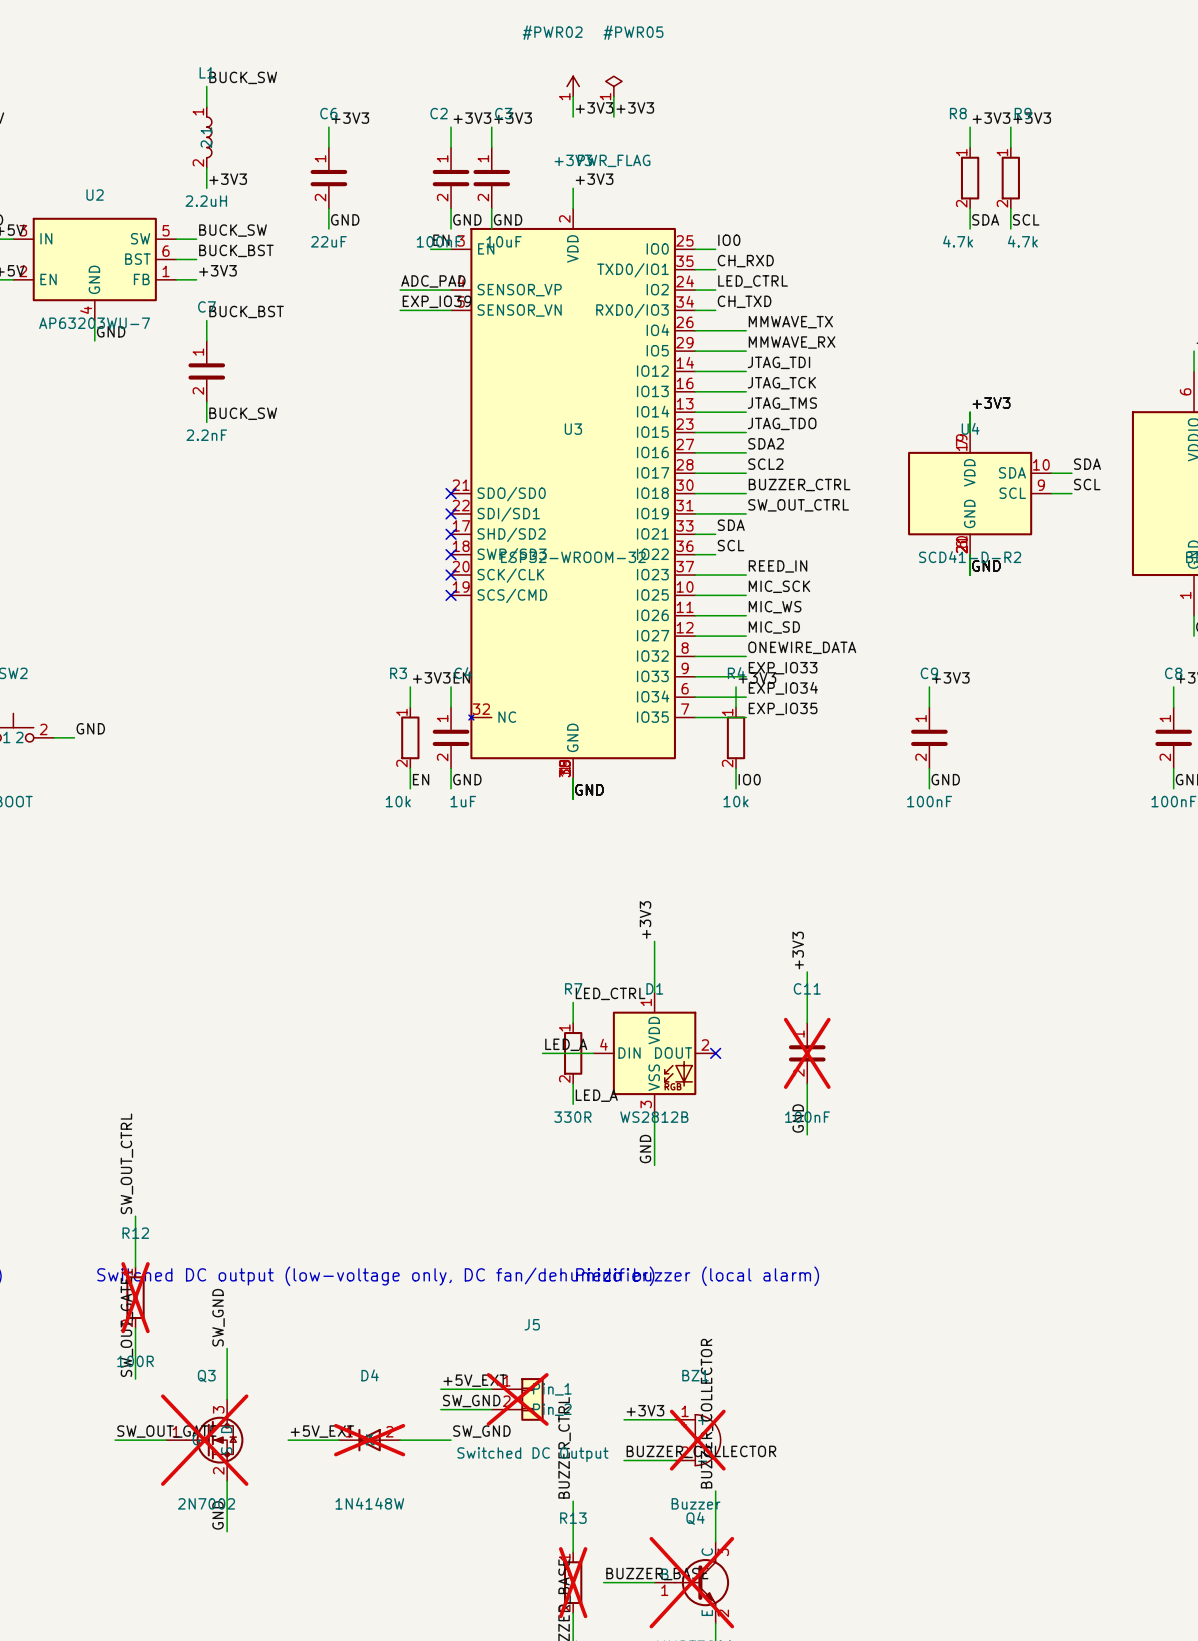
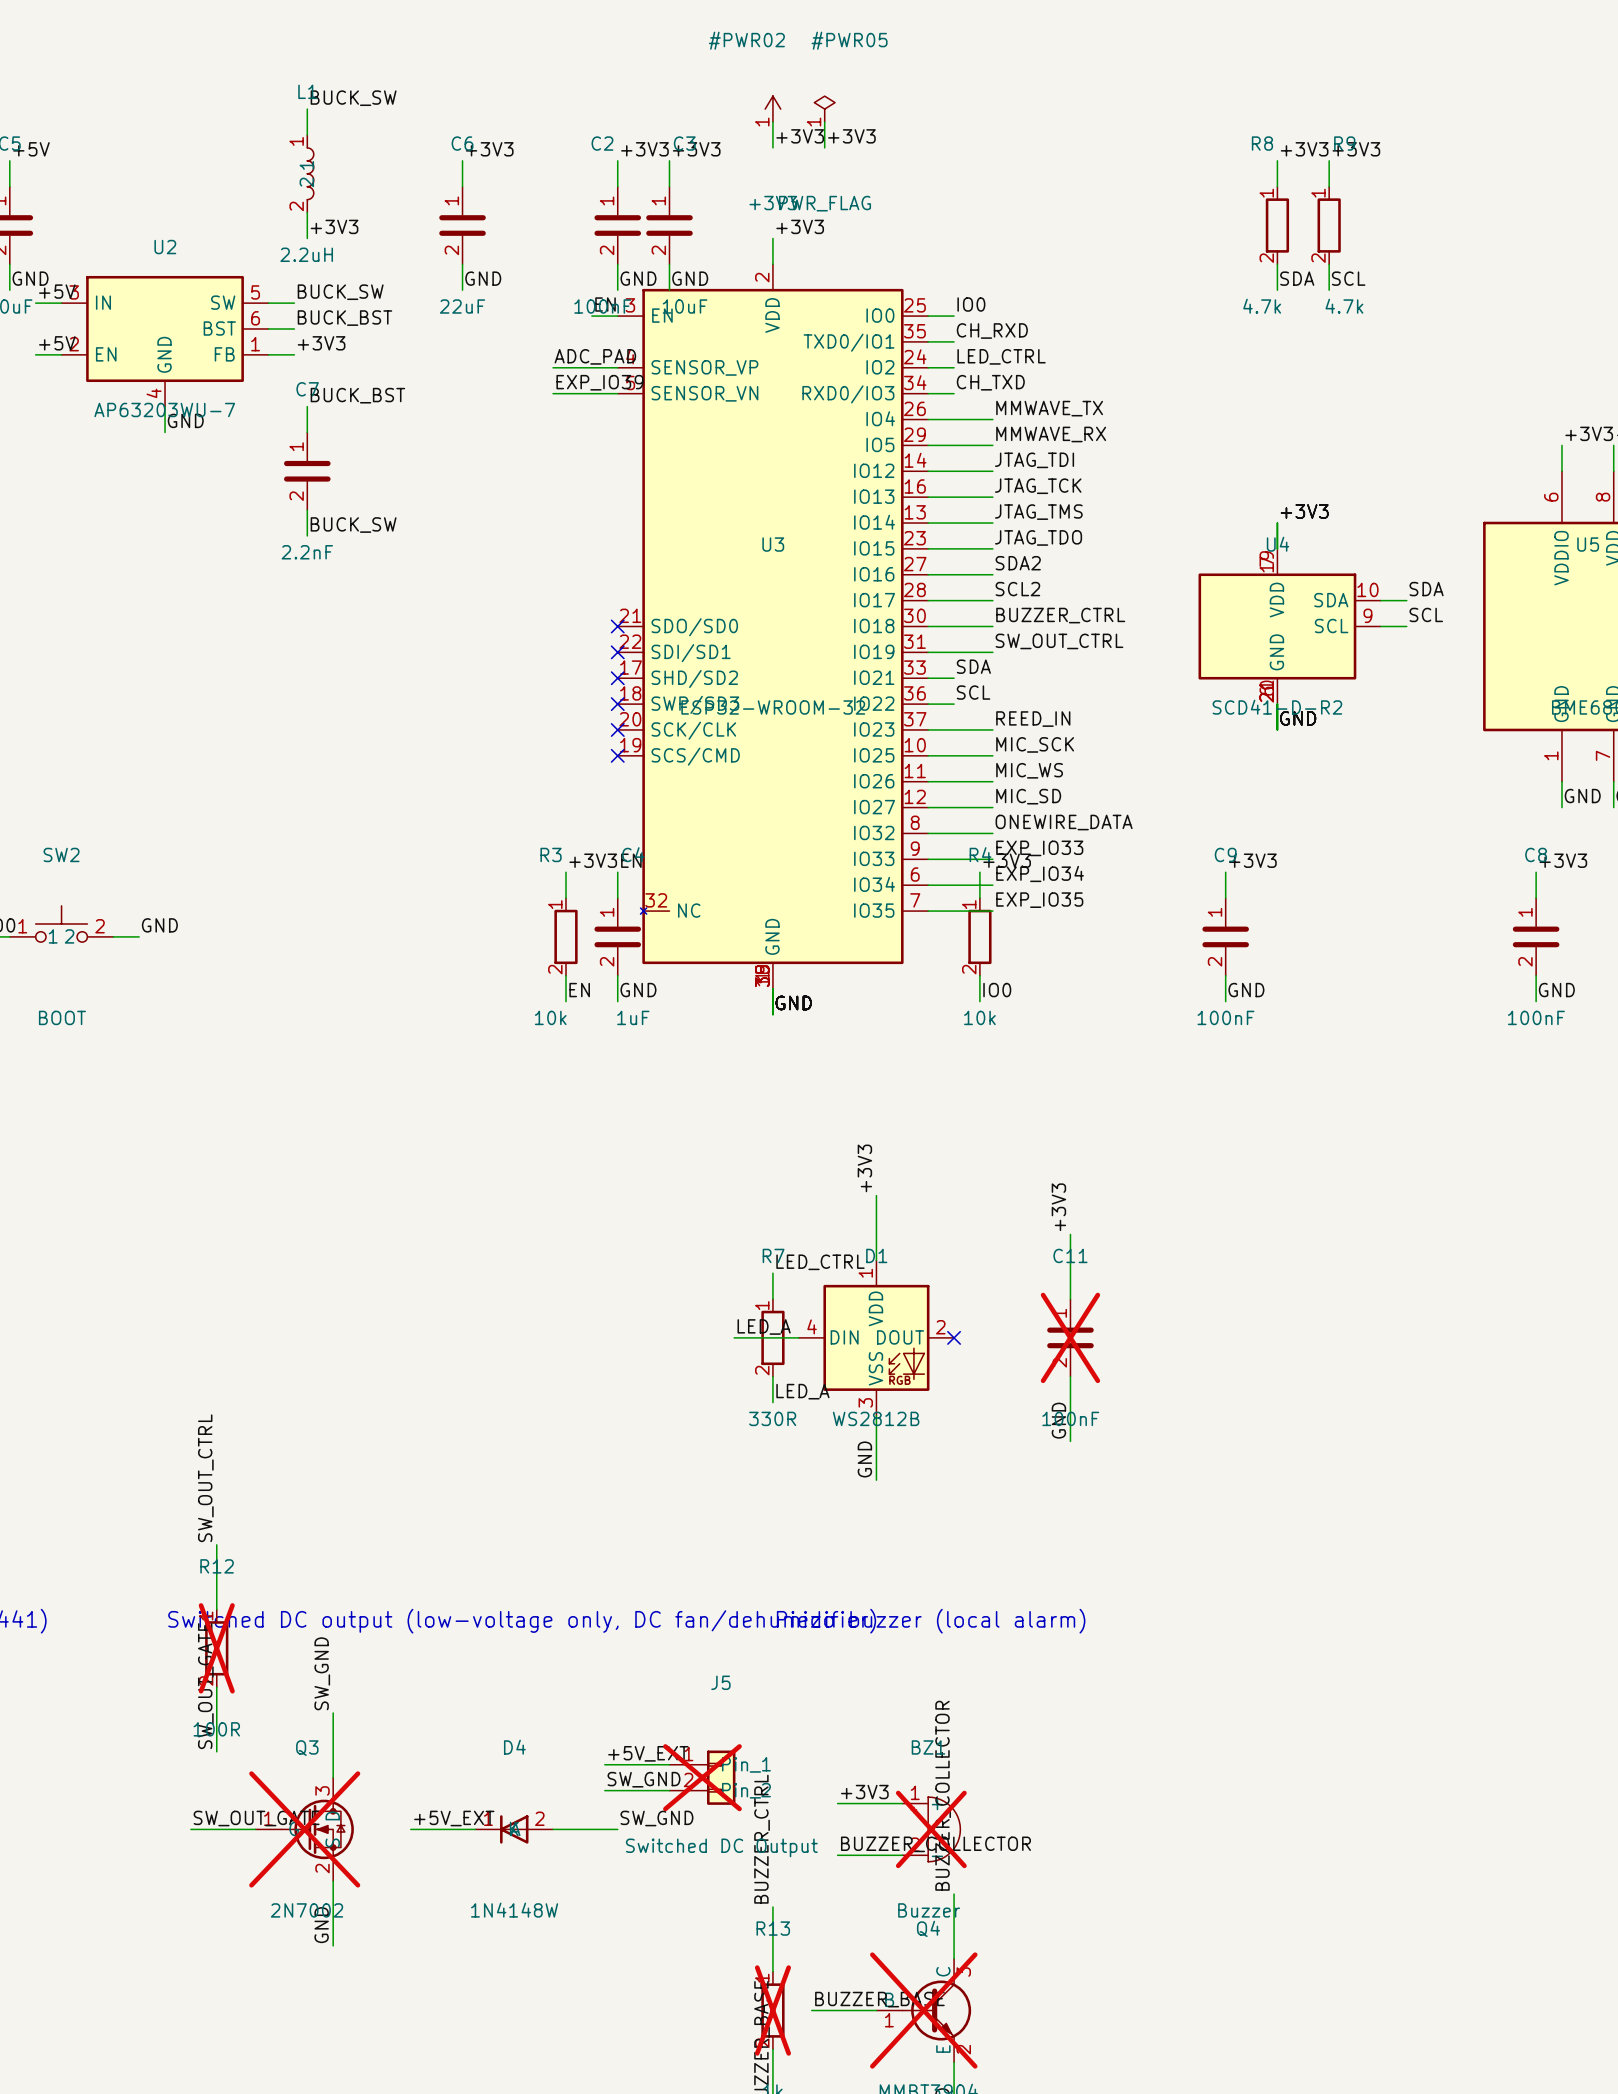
D4 do-not-place cross: (369, 1440) -> none

